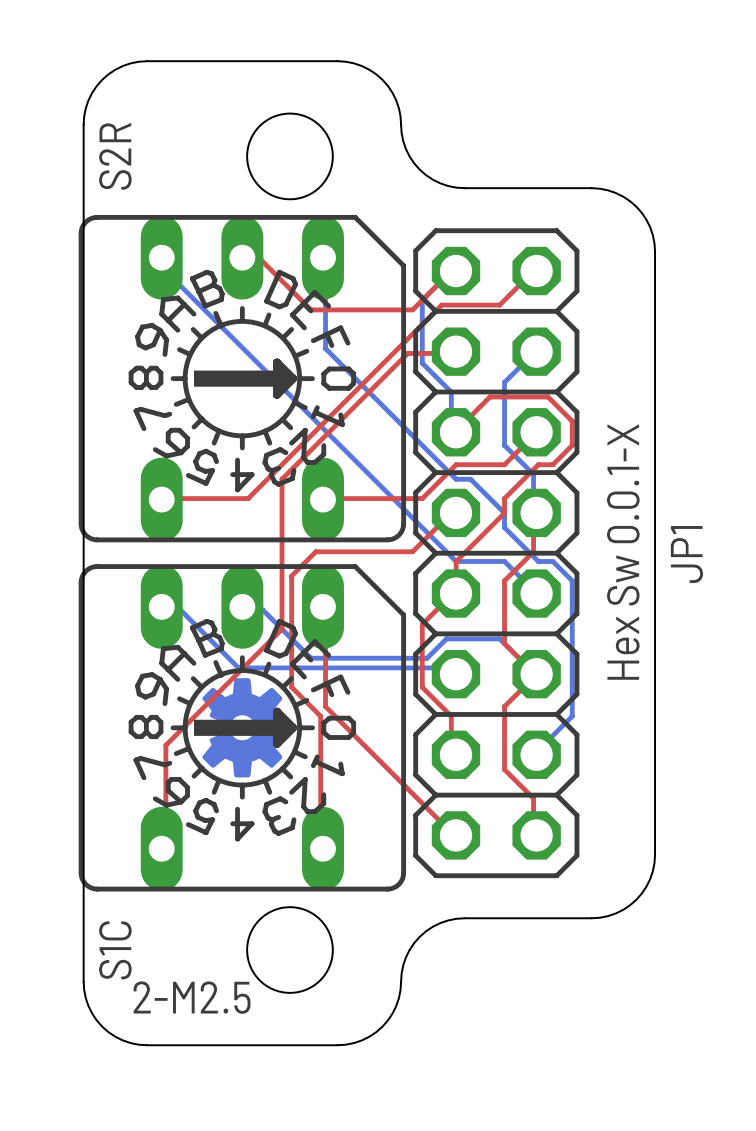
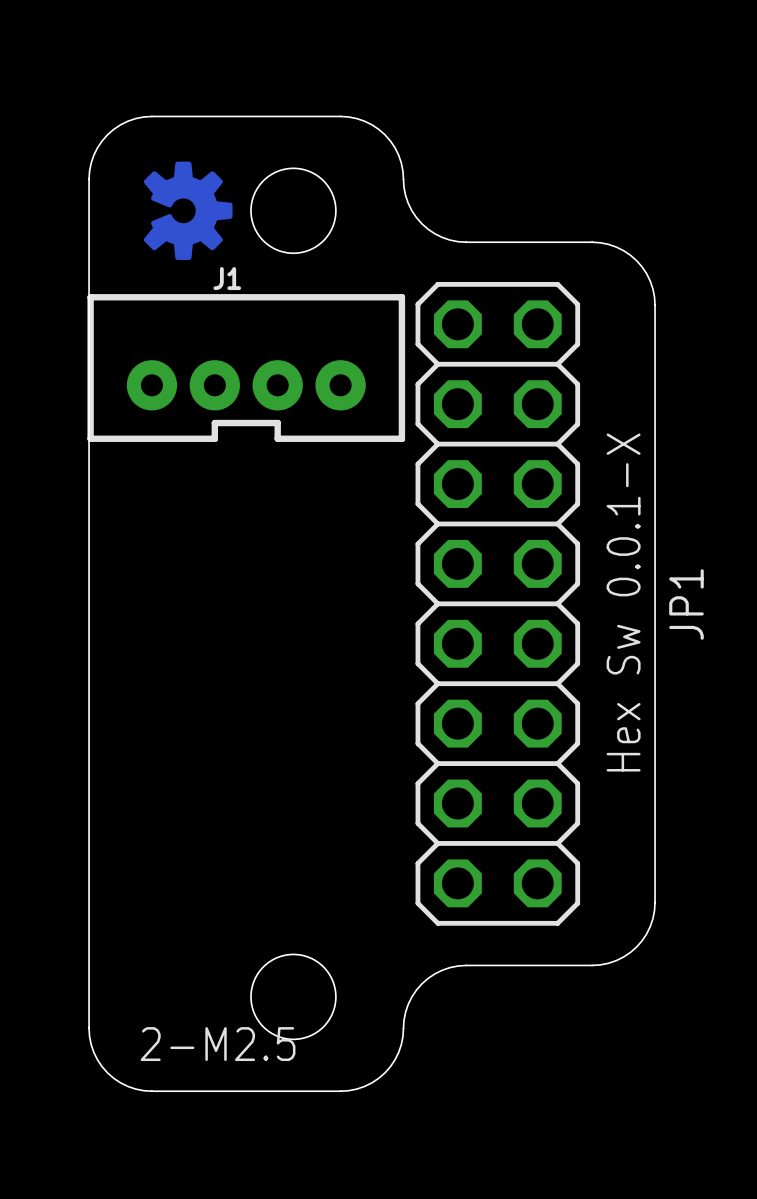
bottom track: (161, 257) (165, 261) (165, 271) (456, 561) (504, 561) (536, 593) -> none
top track: (242, 257) (243, 261) (262, 261) (311, 309) (412, 309) (451, 271) (456, 271) -> none
bottom track: (322, 257) (325, 261) (325, 348) (456, 479) (470, 479) (504, 513) (504, 527) (538, 561) (552, 561) (572, 580) (572, 716) (538, 750) (536, 754) -> none
bottom track: (456, 271) (451, 271) (422, 300) (422, 363) (451, 392) (451, 430) (456, 432) -> none
top track: (536, 271) (533, 271) (499, 305) (441, 305) (248, 498) (161, 499) -> none
J1: none -> (246, 368)
top track: (456, 351) (451, 353) (407, 353) (281, 479) (281, 629) (165, 745) (165, 846) (161, 848) -> none
bottom track: (536, 351) (504, 382) (504, 445) (533, 474) (533, 508) (536, 512) -> none
S2R: (242, 378) -> none
top track: (456, 432) (490, 396) (548, 396) (572, 421) (572, 445) (552, 464) (538, 464) (504, 498) (504, 513) (456, 561) (456, 593) (451, 595) (422, 624) (422, 687) (451, 716) (451, 750) (456, 754) -> none
top track: (536, 432) (504, 464) (456, 464) (422, 498) (322, 499) -> none
top track: (456, 512) (451, 513) (412, 551) (315, 551) (291, 575) (291, 687) (320, 716) (320, 846) (322, 848) -> none
top track: (536, 512) (533, 513) (533, 551) (504, 580) (504, 643) (536, 674) (504, 706) (504, 769) (533, 798) (533, 832) (536, 835) -> none
bottom track: (161, 606) (165, 609) (180, 609) (238, 667) (446, 667) (456, 674) -> none
bottom track: (242, 606) (243, 609) (262, 609) (311, 658) (427, 658) (446, 638) (499, 638) (536, 674) -> none
top track: (322, 606) (325, 609) (325, 706) (456, 835) -> none
S1C: (242, 727) -> none
drawing position: (247, 727) -> (188, 210)

